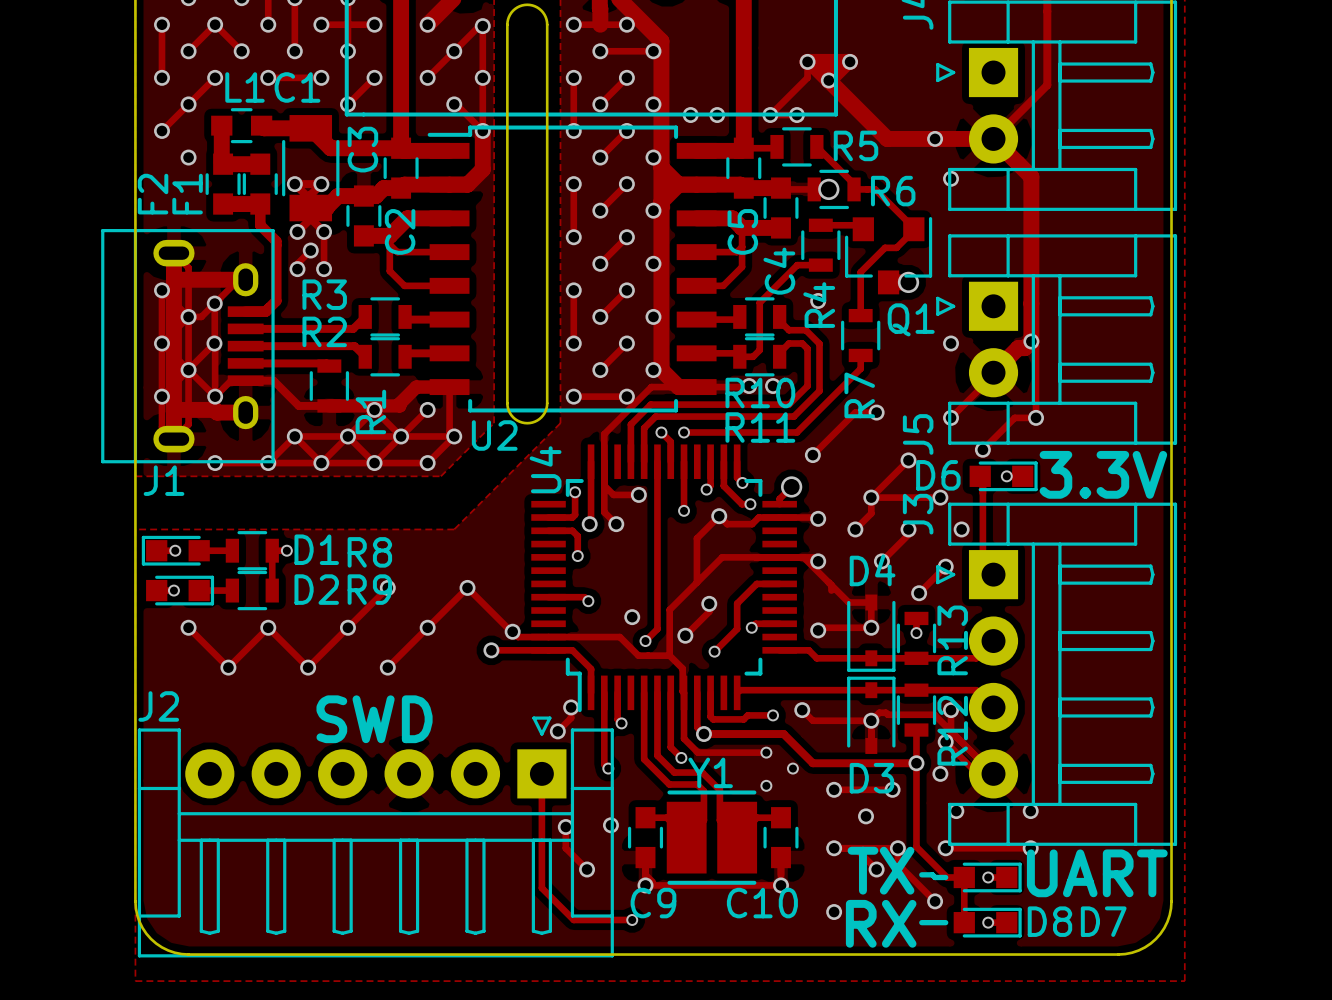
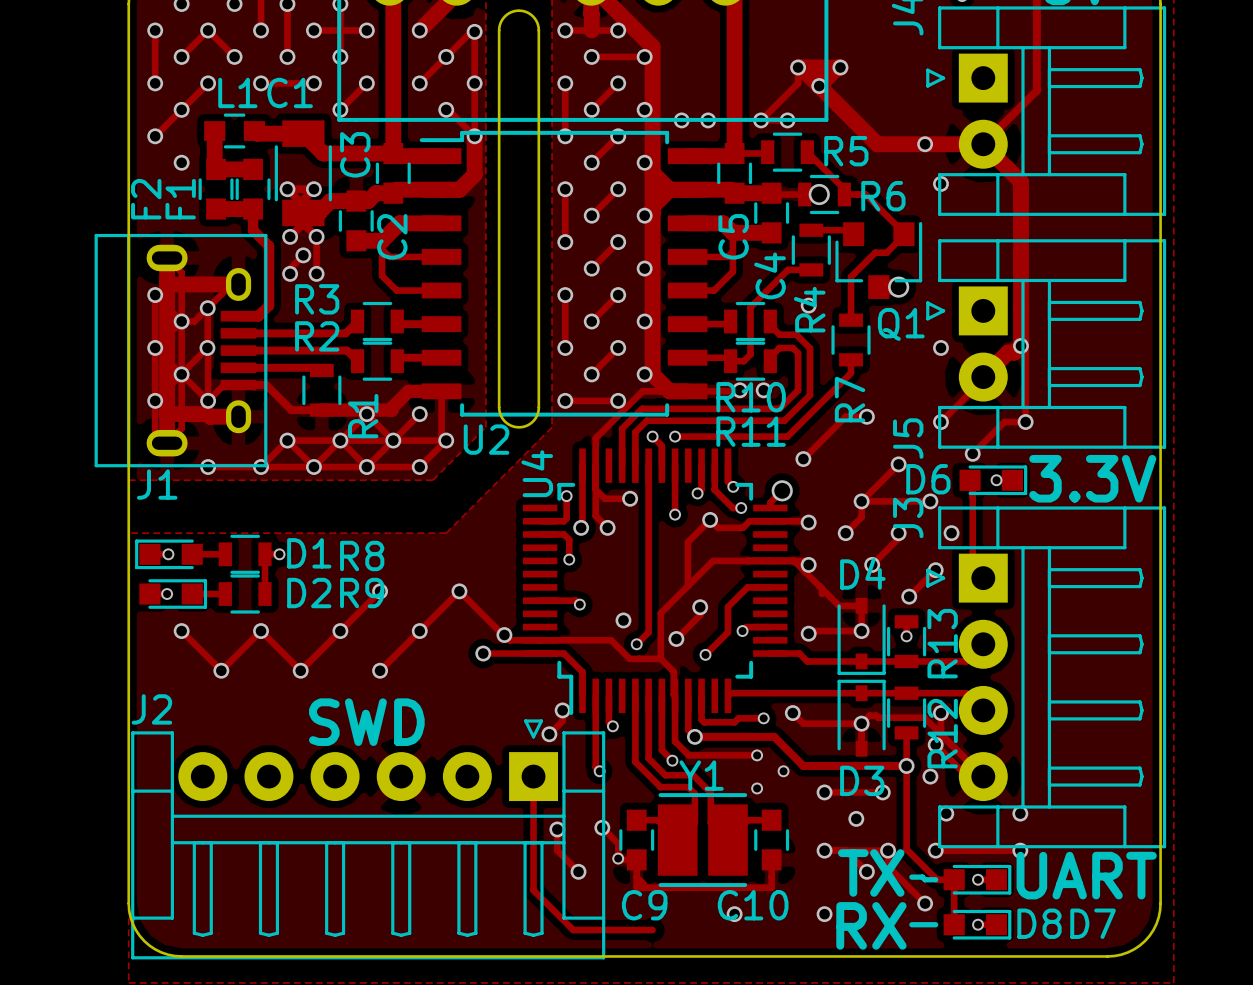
track: none -> (602, 827) (618, 843) (619, 859) (636, 859)
via: (645, 885) -> none
via position: (780, 885) -> (734, 914)
track: (573, 919) (632, 919) -> (565, 922) (573, 930) (652, 930)
via position: (632, 919) -> (618, 858)

